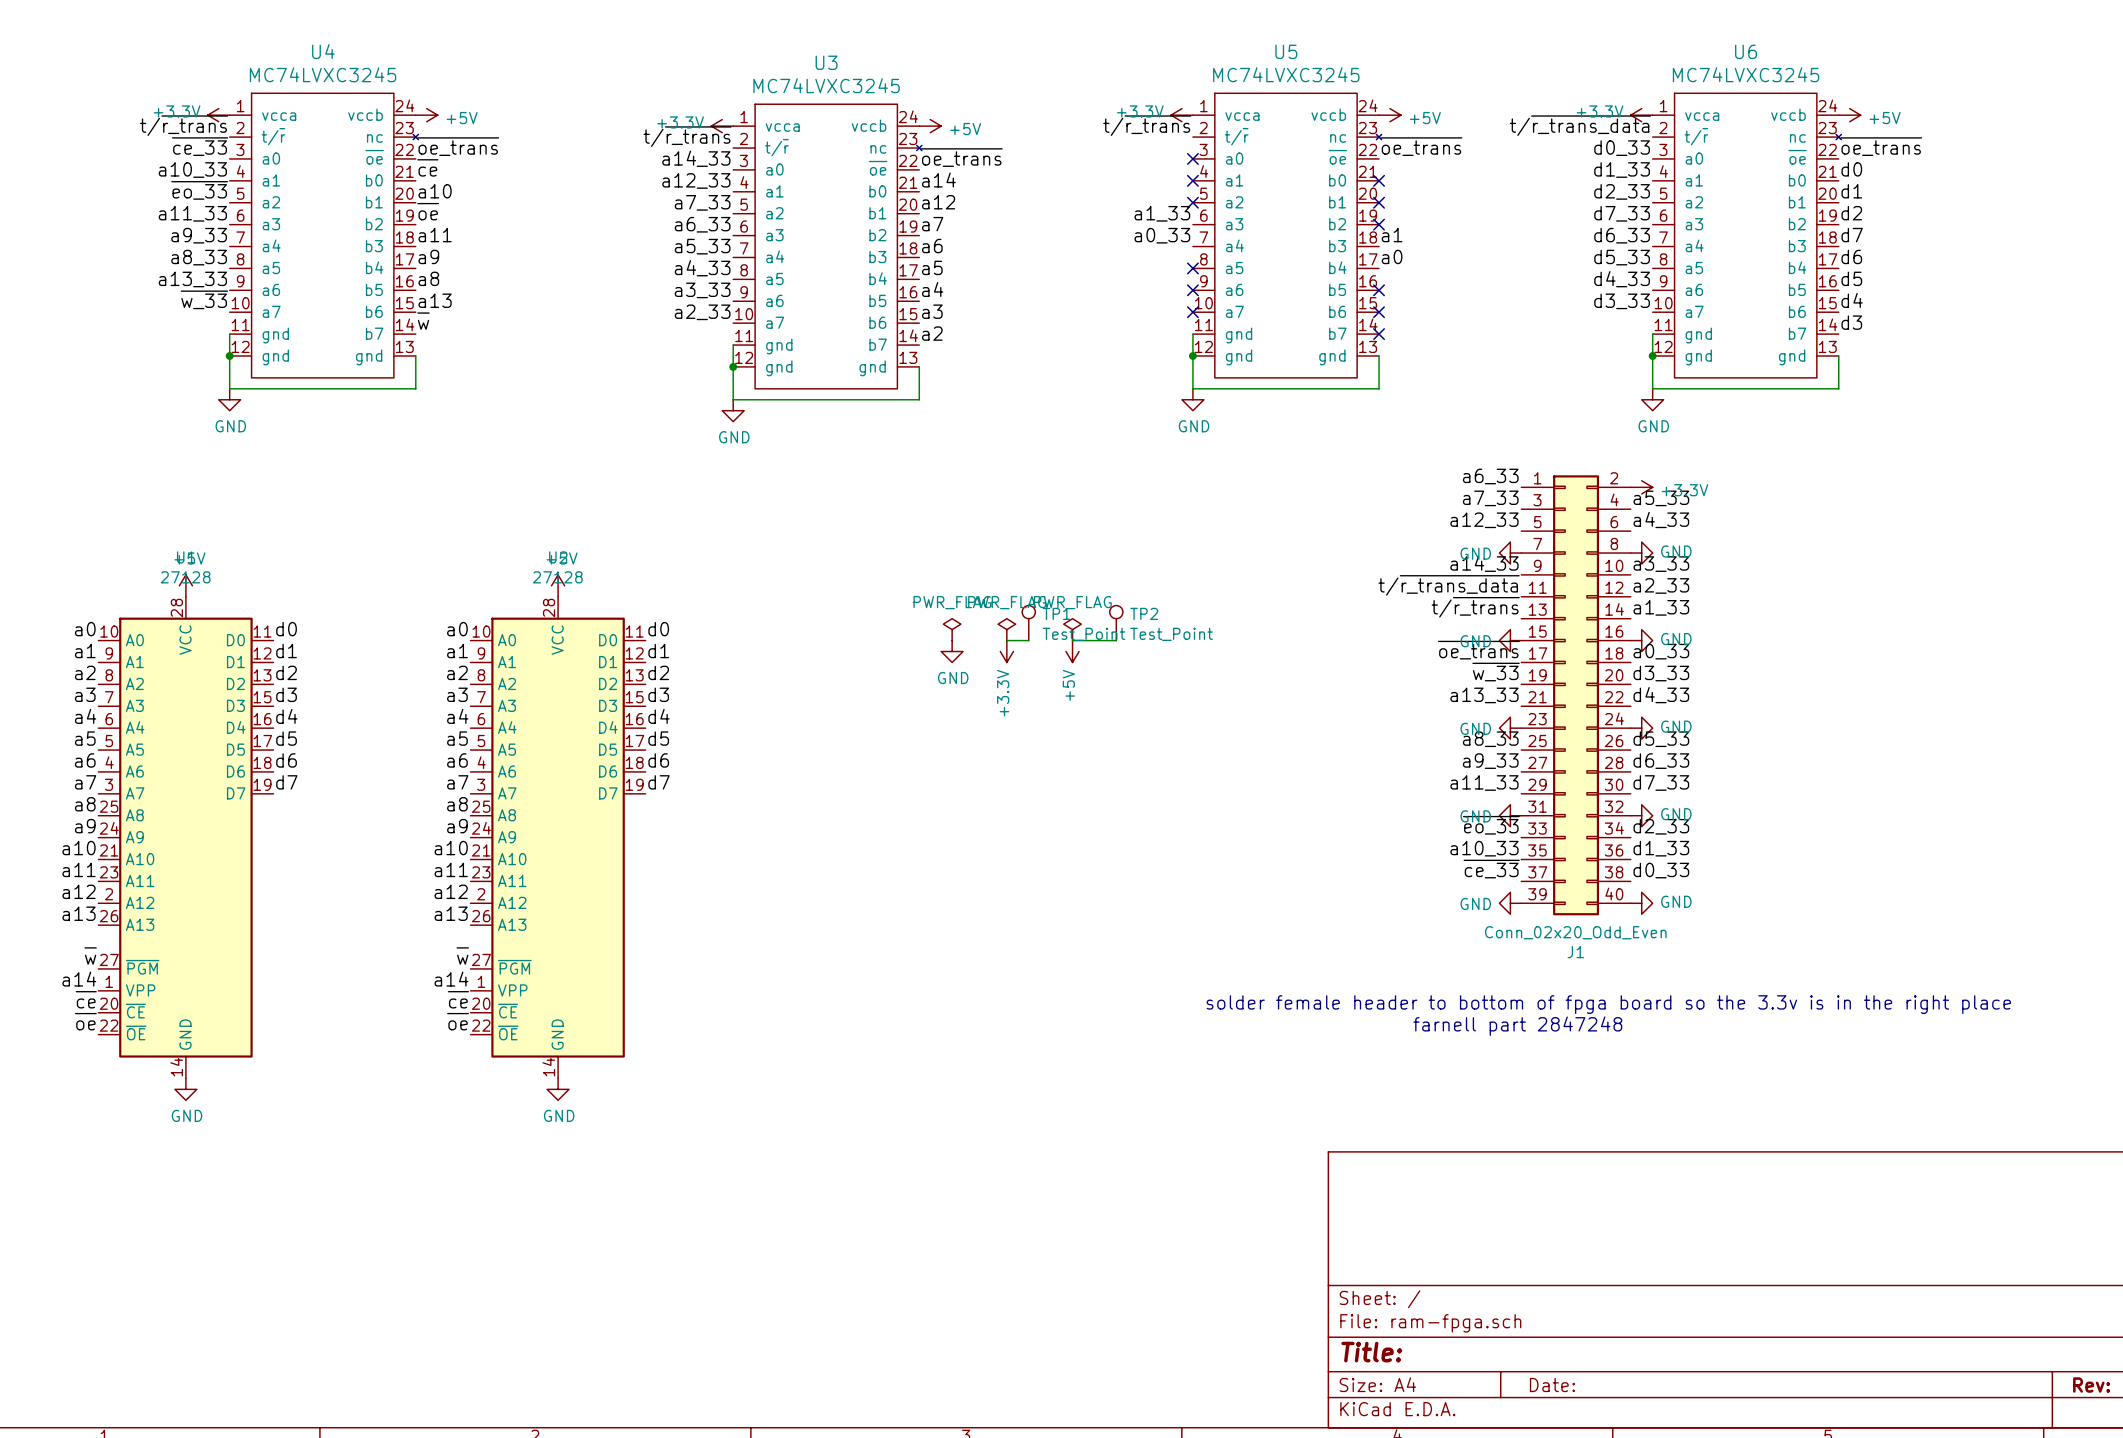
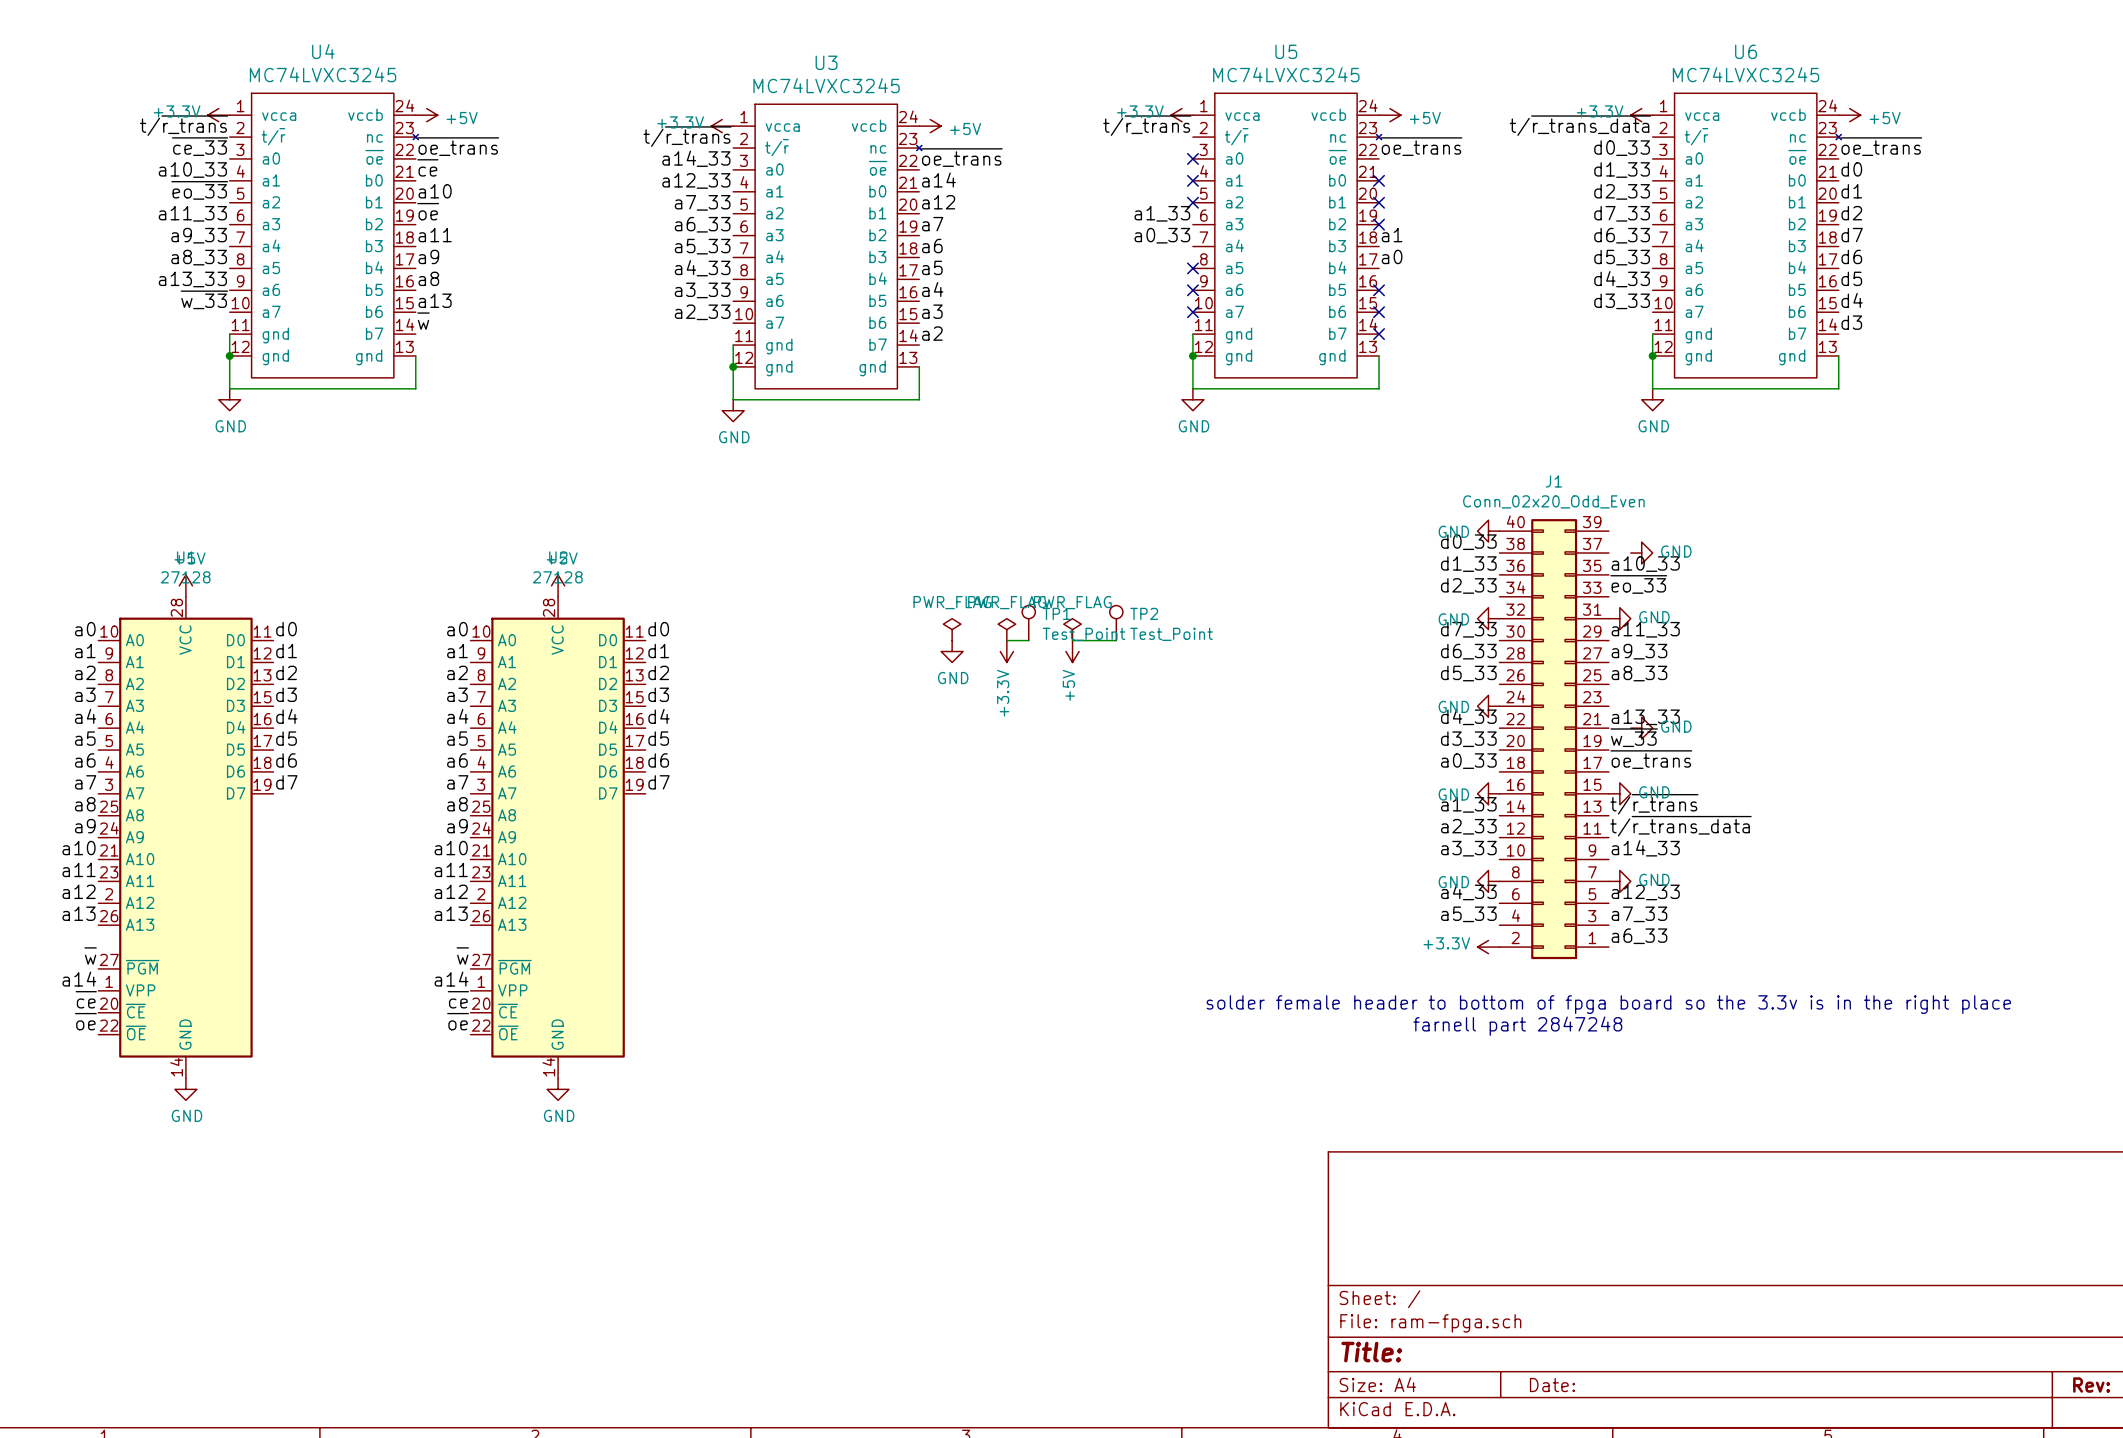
label: a6_33 (1490, 476) -> none
power symbol: +3.3V (1641, 487) -> none
label: a7_33 (1490, 498) -> none
label: a5_33 (1661, 498) -> none
label: a4_33 (1661, 519) -> none
label: a12_33 (1484, 520) -> none
label: none -> d0_33 (1468, 542)
power symbol position: GND (1510, 553) -> GND (1488, 531)
label: a14_33 (1484, 563) -> d1_33 (1468, 564)
label: none -> a10_33 (1645, 564)
label: a3_33 (1661, 564) -> none
label: none -> ~{eo_33} (1638, 584)
label: t/~{r_trans_data} (1449, 585) -> none
label: none -> d2_33 (1468, 585)
label: a2_33 (1661, 585) -> none
label: t/~{r_trans} (1475, 607) -> none
label: a1_33 (1661, 607) -> none
power symbol position: GND (1510, 640) -> GND (1488, 618)
power symbol position: GND (1641, 640) -> GND (1619, 618)
label position: ~{oe_trans} (1478, 650) -> ~{oe_trans} (1651, 759)
label position: a0_33 (1661, 651) -> a0_33 (1468, 761)
label position: ~{w_33} (1496, 672) -> ~{w_33} (1634, 737)
label position: d3_33 (1661, 673) -> d3_33 (1468, 739)
label position: a13_33 (1484, 695) -> a13_33 (1645, 717)
J1 rotation: 0° (1576, 695) -> 180° (1554, 739)
label position: d4_33 (1661, 695) -> d4_33 (1468, 717)
power symbol position: GND (1510, 728) -> GND (1488, 706)
label position: a8_33 (1490, 739) -> a8_33 (1639, 673)
label position: d5_33 (1661, 739) -> d5_33 (1468, 673)
label position: a9_33 (1490, 761) -> a9_33 (1639, 651)
label position: d6_33 (1661, 761) -> d6_33 (1468, 651)
label position: a11_33 (1484, 782) -> a11_33 (1645, 629)
label position: d7_33 (1661, 782) -> d7_33 (1468, 629)
label: none -> a1_33 (1468, 804)
label: none -> t/~{r_trans} (1654, 804)
power symbol position: GND (1510, 815) -> GND (1488, 793)
power symbol position: GND (1641, 815) -> GND (1619, 793)
label: ~{eo_33} (1491, 825) -> none
label: none -> a2_33 (1468, 826)
label: d2_33 (1661, 826) -> none
label: none -> t/~{r_trans_data} (1681, 826)
label: none -> a3_33 (1468, 848)
label: a10_33 (1484, 848) -> none
label: d1_33 (1661, 848) -> a14_33 (1645, 848)
label: ~{ce_33} (1491, 869) -> none
label: d0_33 (1661, 870) -> none
label: none -> a4_33 (1468, 892)
label: none -> a12_33 (1645, 892)
power symbol position: GND (1510, 903) -> GND (1488, 881)
power symbol position: GND (1641, 903) -> GND (1619, 881)
label: none -> a5_33 (1468, 914)
label: none -> a7_33 (1639, 914)
label: none -> a6_33 (1639, 936)
power symbol: none -> +3.3V (1488, 947)

